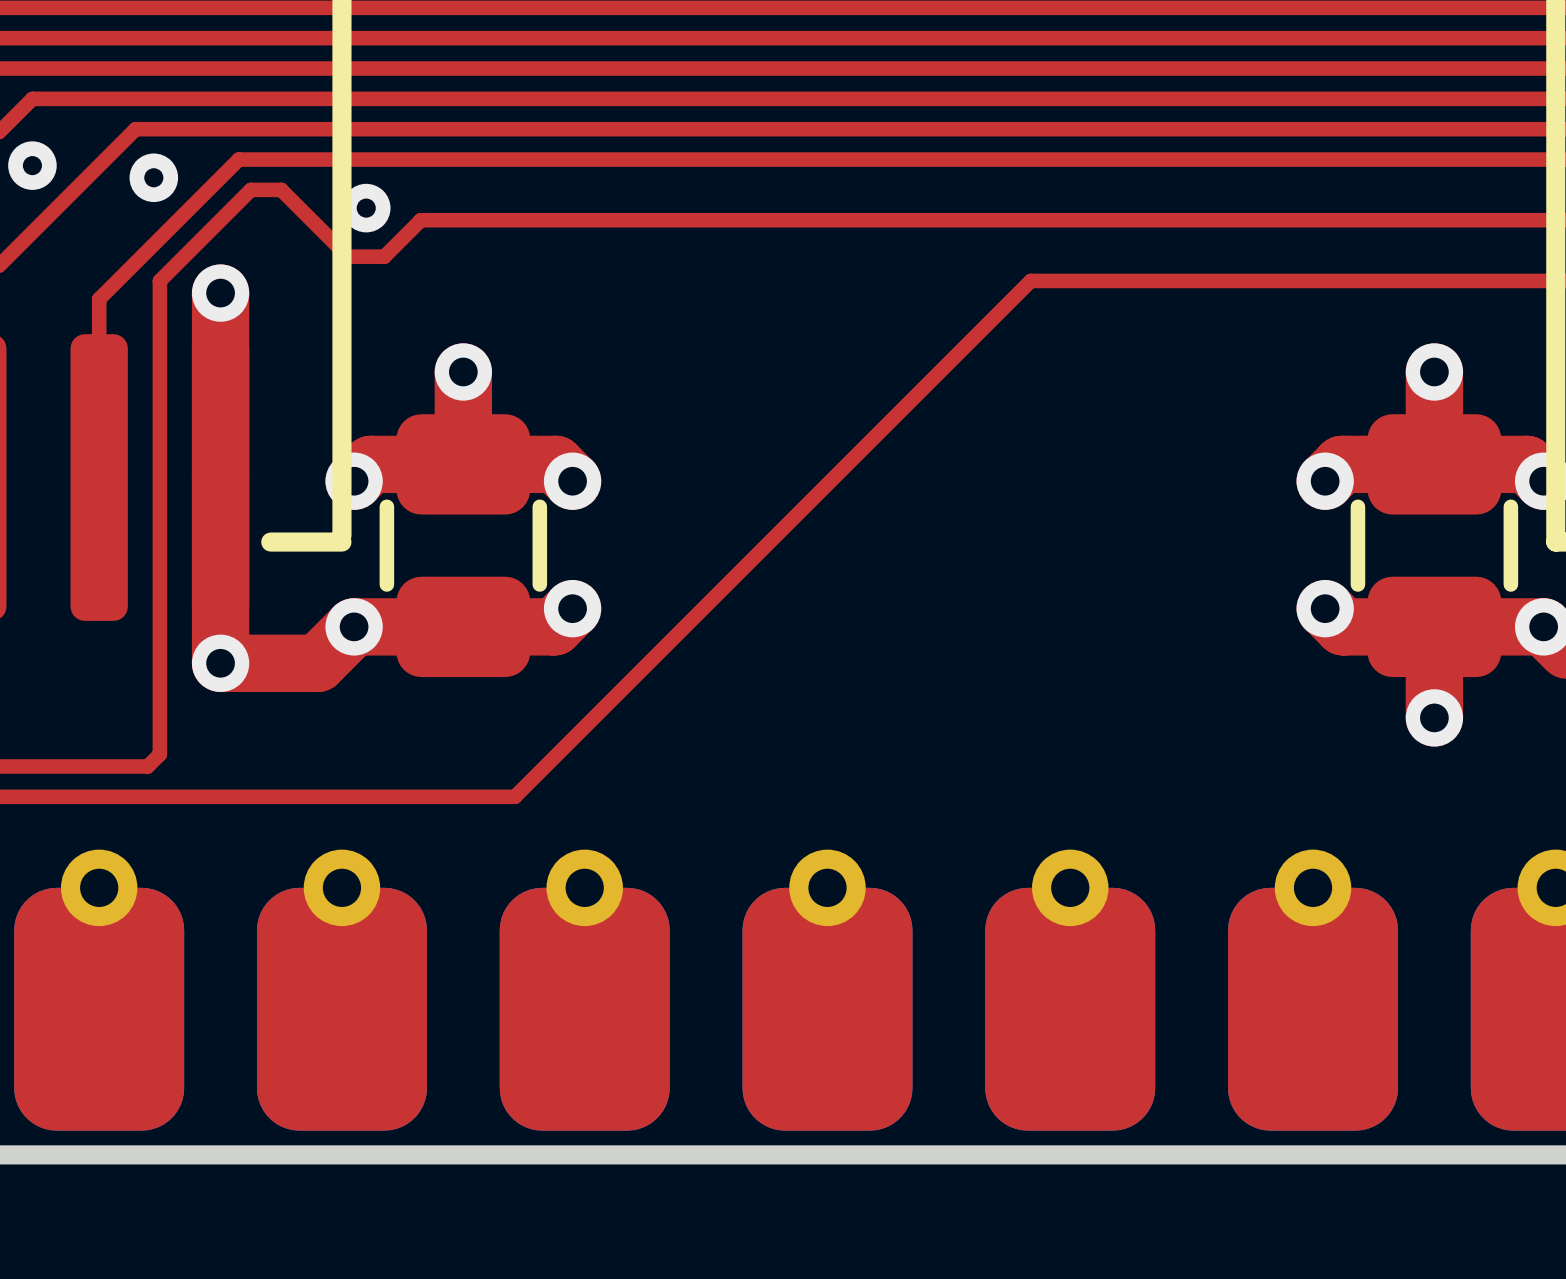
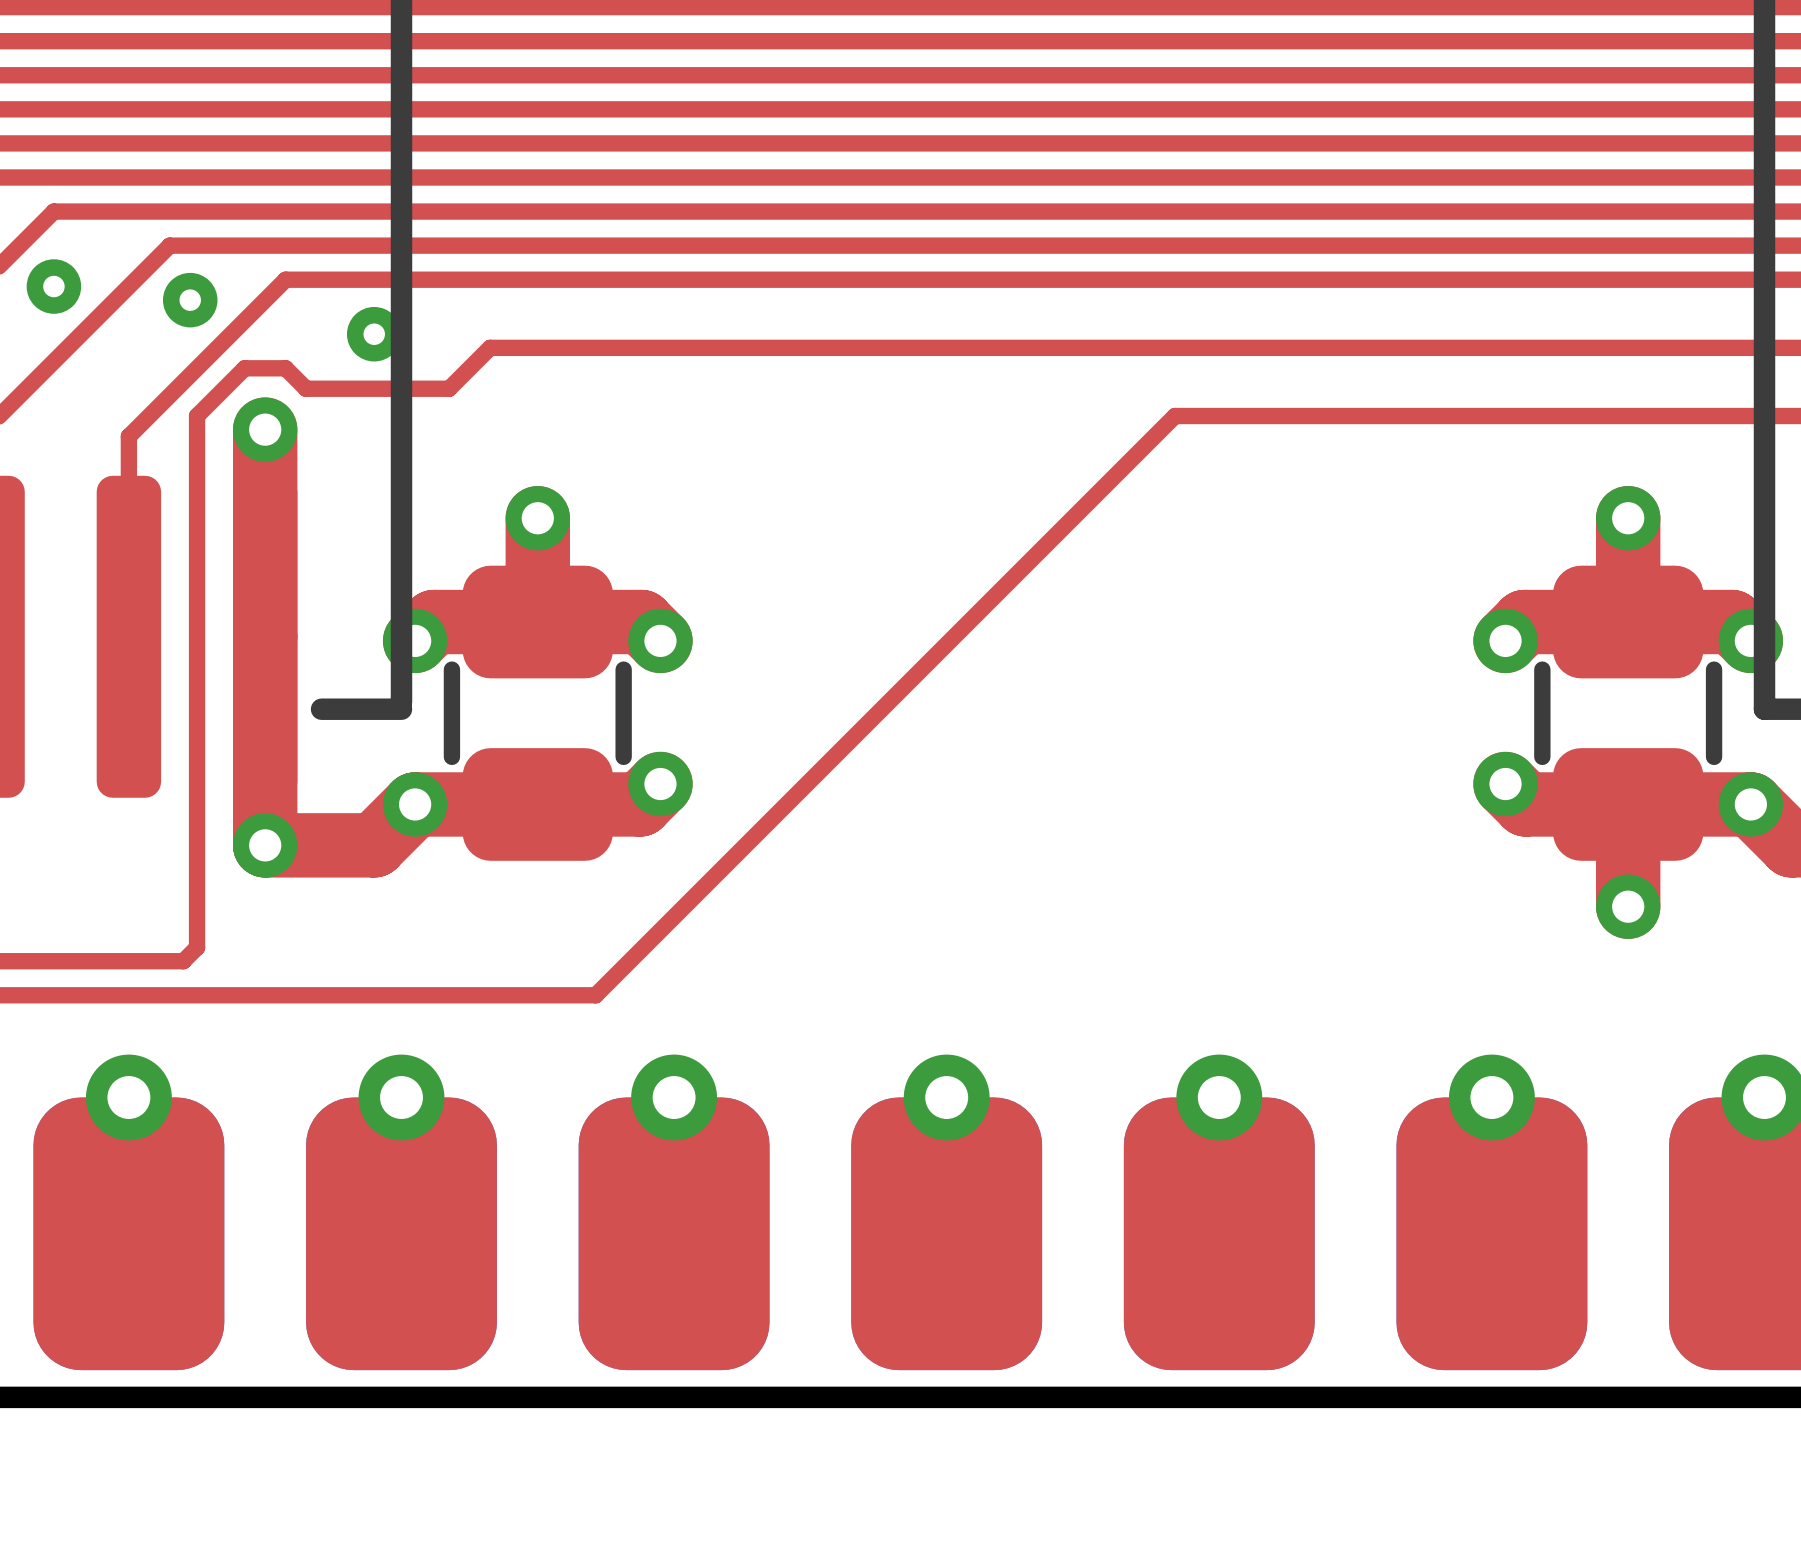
via position: (366, 208) -> (374, 334)
top track: (202, 238) (250, 189) (281, 189) (348, 256) -> (244, 368) (285, 368) (306, 388) (408, 388)

